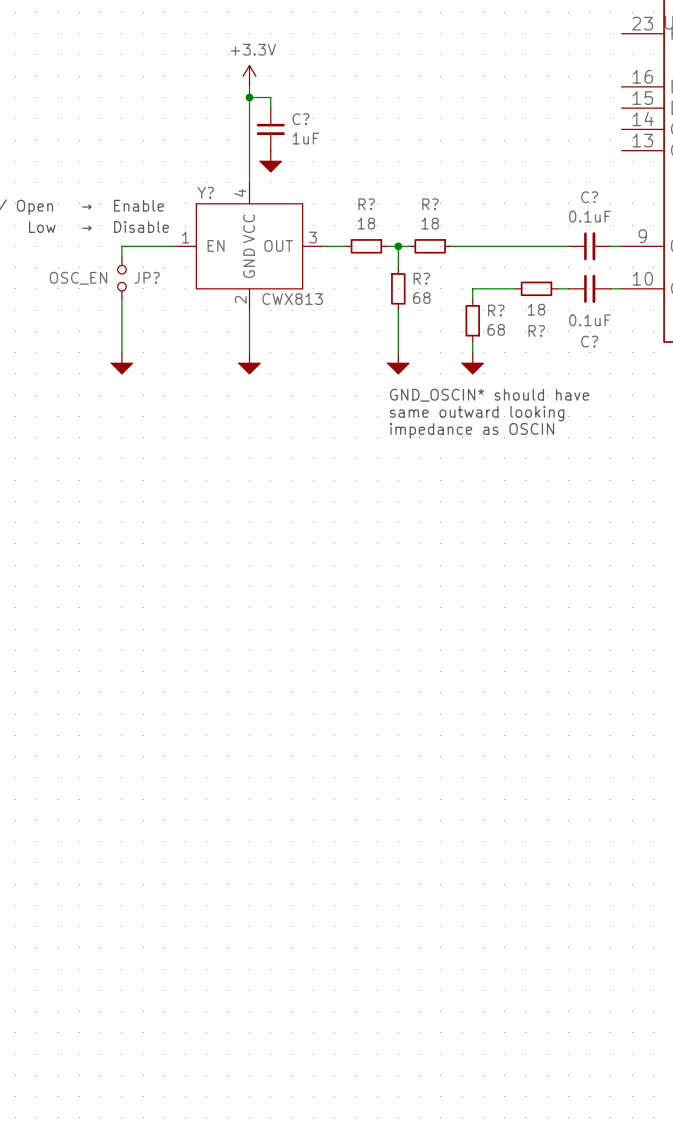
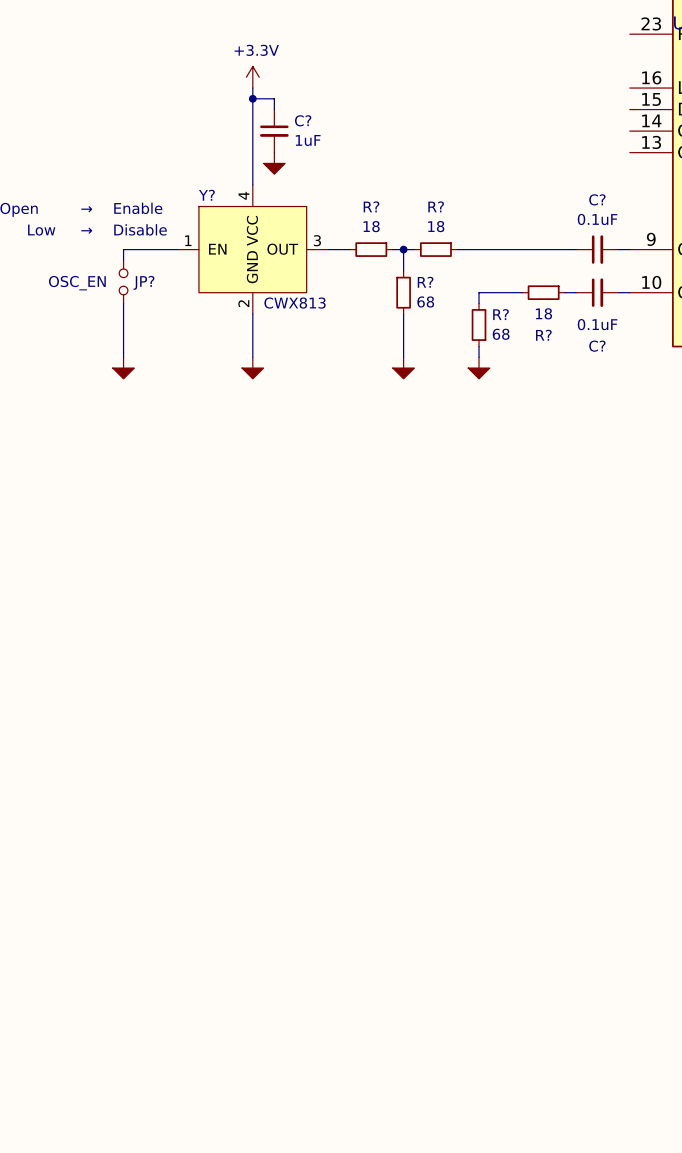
text: GND_OSCIN* should have (489, 395) -> none
text: same outward looking (477, 413) -> none
text: impedance as OSCIN (472, 430) -> none

